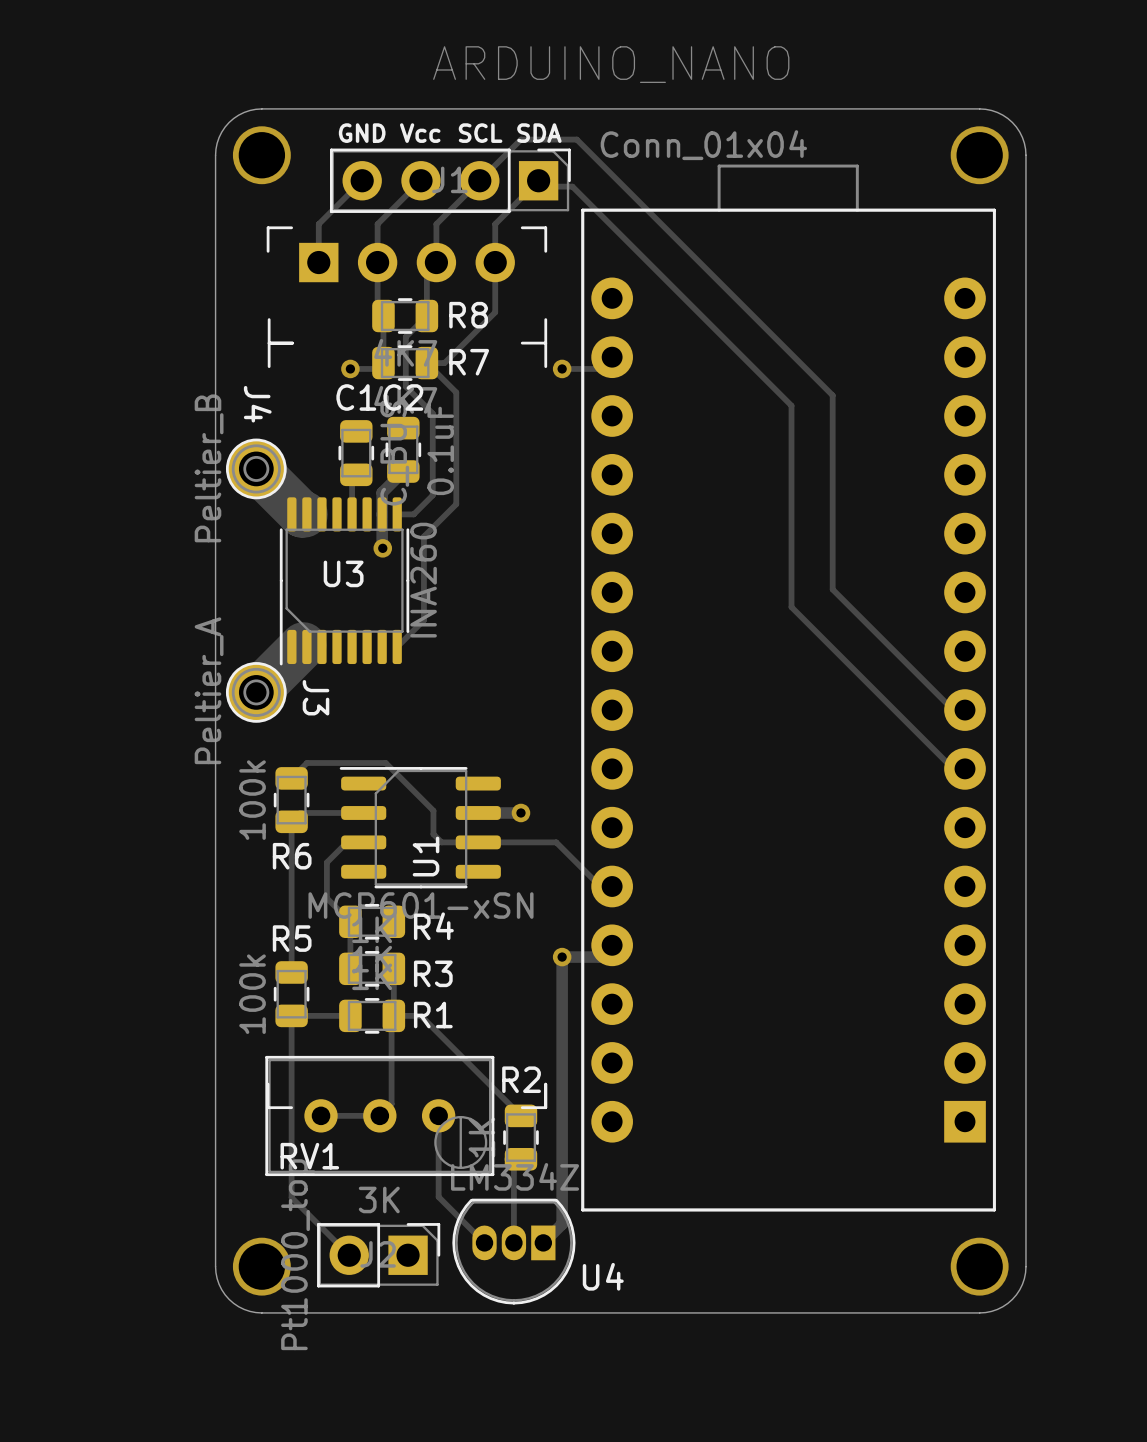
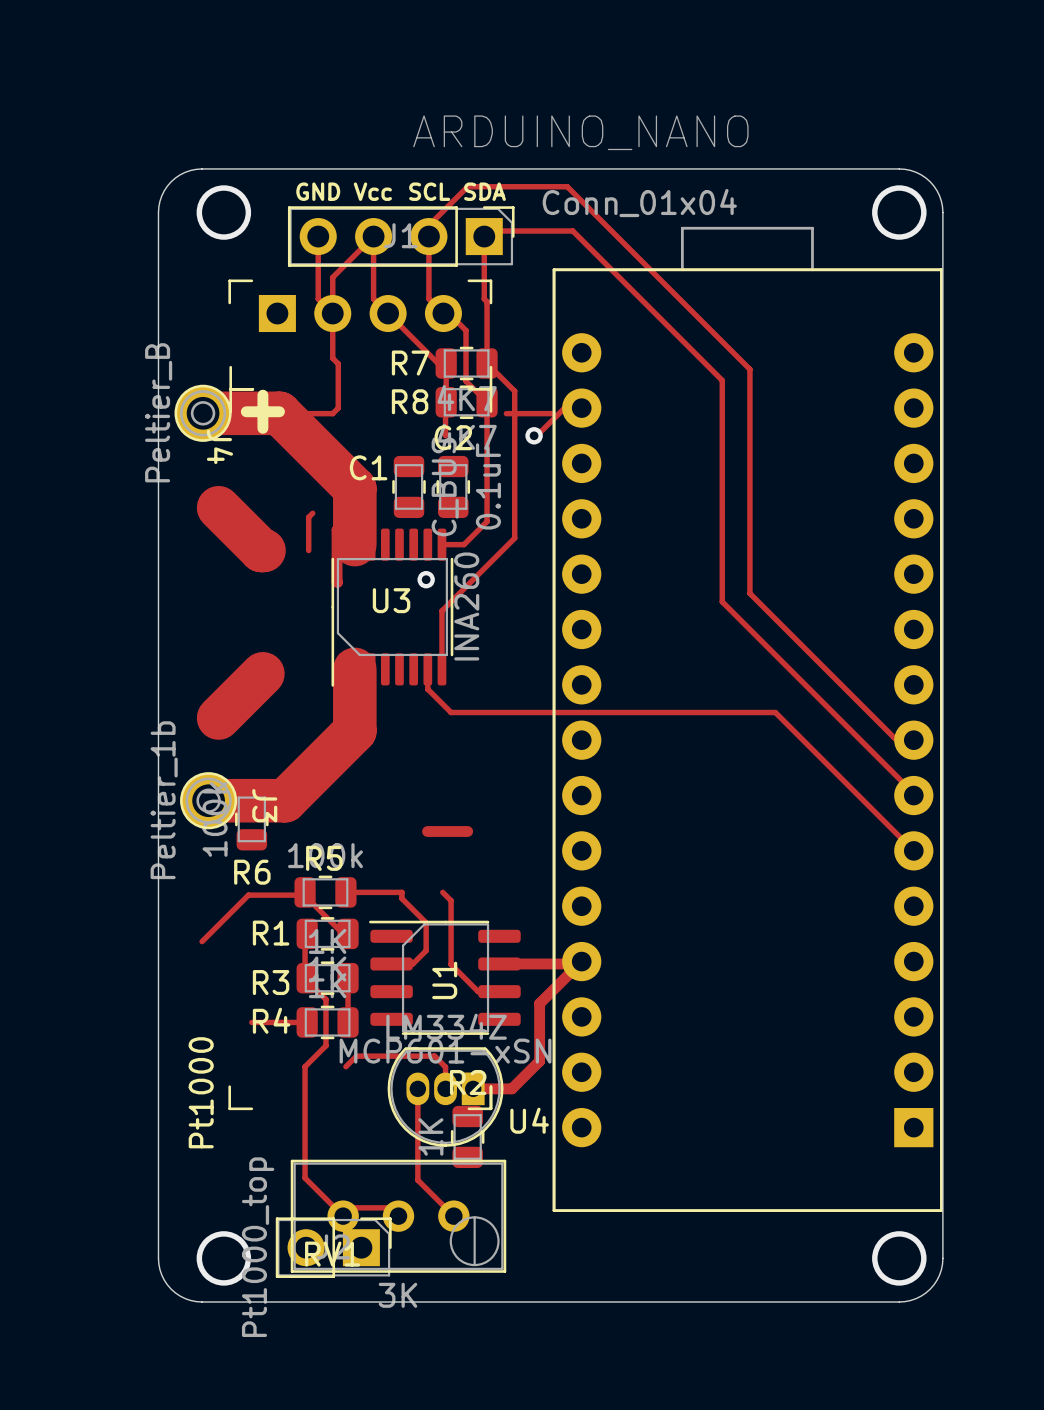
board edge: (261, 108) (244, 112) (229, 122) (219, 137) (215, 155) (215, 1266) (219, 1284) (229, 1299) (244, 1309) (261, 1312) -> (223, 168) (196, 169) (180, 174) (164, 190) (158, 212) (158, 1258) (164, 1280) (180, 1296) (196, 1301) (223, 1302)
track: none -> (318, 225) (318, 298) (321, 302)
track: none -> (373, 225) (373, 298) (438, 363) (446, 363) (445, 435)
track: (362, 180) (318, 224) (318, 262) (321, 260) -> none
track: none -> (432, 302) (428, 298) (428, 225) (467, 186) (567, 186) (749, 369) (749, 593) (894, 738) (908, 738)
track: none -> (437, 302) (466, 330) (466, 381) (487, 402) (487, 521) (463, 544) (441, 544)
track: (438, 260) (426, 272) (426, 316) (405, 337) (405, 386) (432, 413) (432, 495) (413, 514) (397, 514) -> none
track: (436, 262) (436, 224) (520, 139) (576, 139) (832, 395) (832, 589) (965, 721) -> none
R8 name position: R8 (468, 315) -> R8 (410, 401)
R8 position: (405, 316) -> (466, 402)
R7 name position: R7 (469, 362) -> R7 (410, 363)
R7 position: (405, 363) -> (466, 363)
track: none -> (581, 408) (564, 408) (536, 435) (534, 435)
text: none -> + (262, 411)
track: none -> (203, 413) (279, 413) (354, 488) (354, 544)
via: (350, 368) -> none
via position: (562, 368) -> (534, 435)
C1 name position: C1 (356, 397) -> C1 (368, 467)
track: (791, 405) (572, 186) (544, 186) (538, 180) (495, 224) (495, 312) (444, 363) (426, 363) (456, 392) (456, 504) (423, 536) (423, 620) (397, 646) -> (722, 448) (722, 380) (572, 231) (489, 231) (484, 225) (484, 298) (487, 302) (487, 363) (514, 391) (514, 538) (441, 610) (441, 669)
C2 position: (403, 449) -> (453, 486)
C1 position: (356, 453) -> (409, 486)
J4 position: (256, 468) -> (203, 413)
via position: (382, 548) -> (426, 579)
track: (791, 568) (791, 607) (965, 780) -> (722, 601) (904, 784) (904, 801)
U3 position: (344, 581) -> (392, 607)
track: none -> (354, 669) (354, 730) (285, 800) (208, 800)
track: none -> (427, 669) (427, 689) (451, 712) (775, 712) (913, 850)
part position: (788, 688) -> (747, 719)
J3 value: Peltier_A (209, 690) -> Peltier_1b (164, 800)
J3 position: (256, 692) -> (208, 800)
track: (291, 778) (307, 762) (385, 762) (433, 810) (433, 834) (441, 842) (556, 842) (612, 898) -> none
track: (363, 812) (300, 812) (291, 821) (291, 972) -> none
via: (520, 812) -> none
U1 position: (420, 827) -> (444, 977)
track: (363, 842) (347, 842) (326, 862) (326, 898) (350, 921) (350, 968) -> none
U1 name position: U1 (426, 856) -> U1 (444, 980)
track: none -> (345, 892) (401, 892) (401, 898) (426, 922) (426, 950) (412, 963) (391, 963)
track: none -> (442, 892) (451, 900) (451, 964) (478, 991) (499, 991)
track: none -> (305, 936) (305, 978) (325, 999) (325, 1045) (305, 1066) (305, 1178) (343, 1216)
track: none -> (345, 936) (305, 895) (305, 892) (302, 895) (248, 895) (202, 941)
R4 name: R4 (433, 926) -> R1 (271, 933)
track: (612, 945) (600, 957) (562, 957) (562, 1224) (543, 1242) -> none
track: none -> (581, 961) (539, 1003) (539, 1061) (511, 1088) (473, 1088)
track: none -> (499, 963) (579, 963)
via: (562, 957) -> none
R3 name position: R3 (433, 973) -> R3 (271, 982)
R5 rotation: 0° (291, 994) -> 90° clockwise (325, 892)
R5 position: (291, 994) -> (325, 892)
R1 name: R1 (433, 1015) -> R4 (271, 1020)
track: (285, 1021) (291, 1015) (291, 1197) (349, 1255) -> none
track: none -> (345, 1066) (356, 1056) (434, 1056) (445, 1067) (445, 1088)
track: none -> (417, 1088) (417, 1180) (453, 1216)
text: none -> Pt1000 (201, 1092)
track: (321, 1115) (379, 1115) (391, 1104) (391, 1018) (393, 1015) (421, 1015) (520, 1115) -> none
RV1 position: (379, 1115) -> (398, 1216)
track: (438, 1115) (438, 1197) (484, 1242) -> none
track: (506, 1159) (520, 1159) (513, 1166) (513, 1242) -> none
track: none -> (343, 1207) (398, 1207)
U4 position: (513, 1251) -> (445, 1097)

